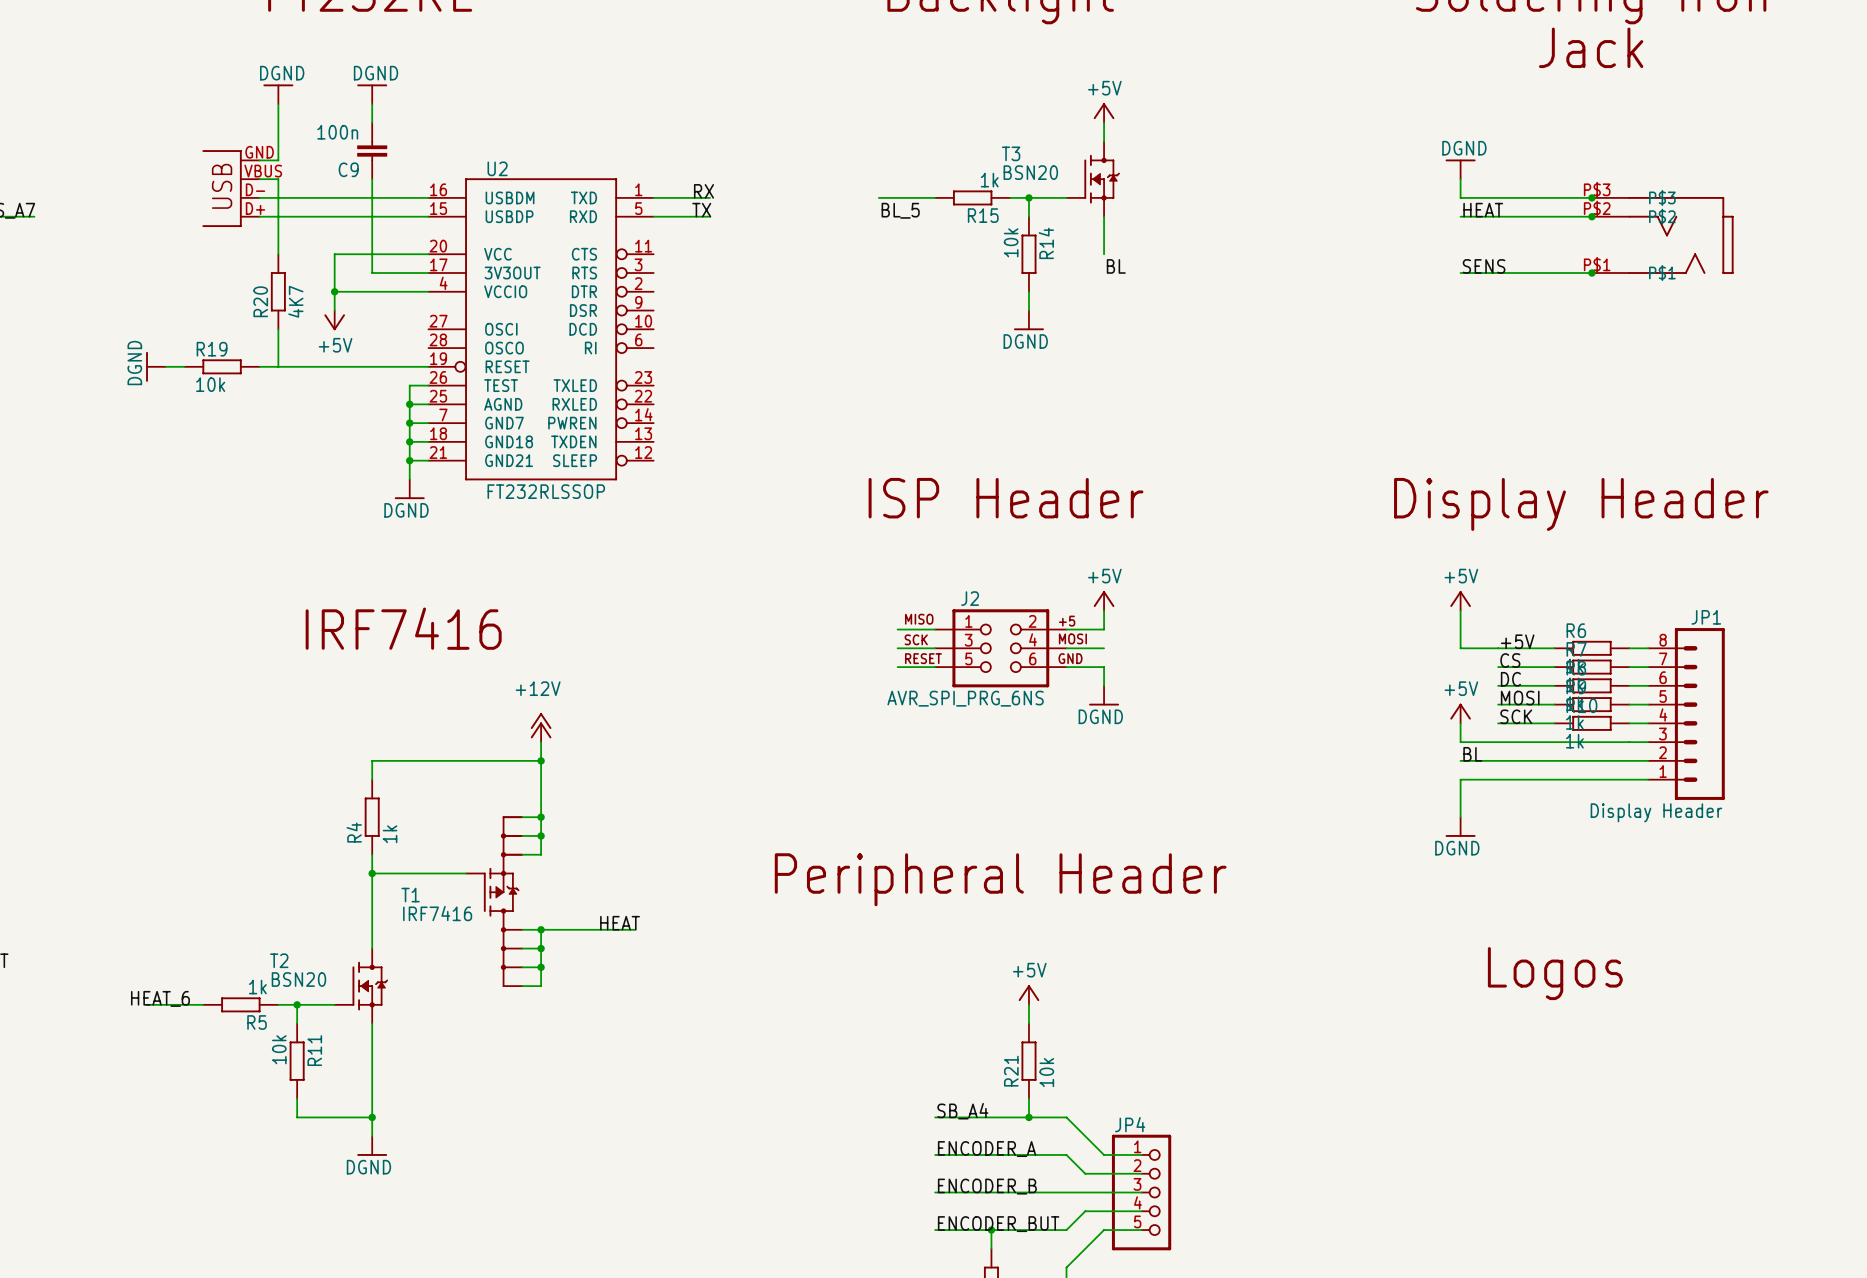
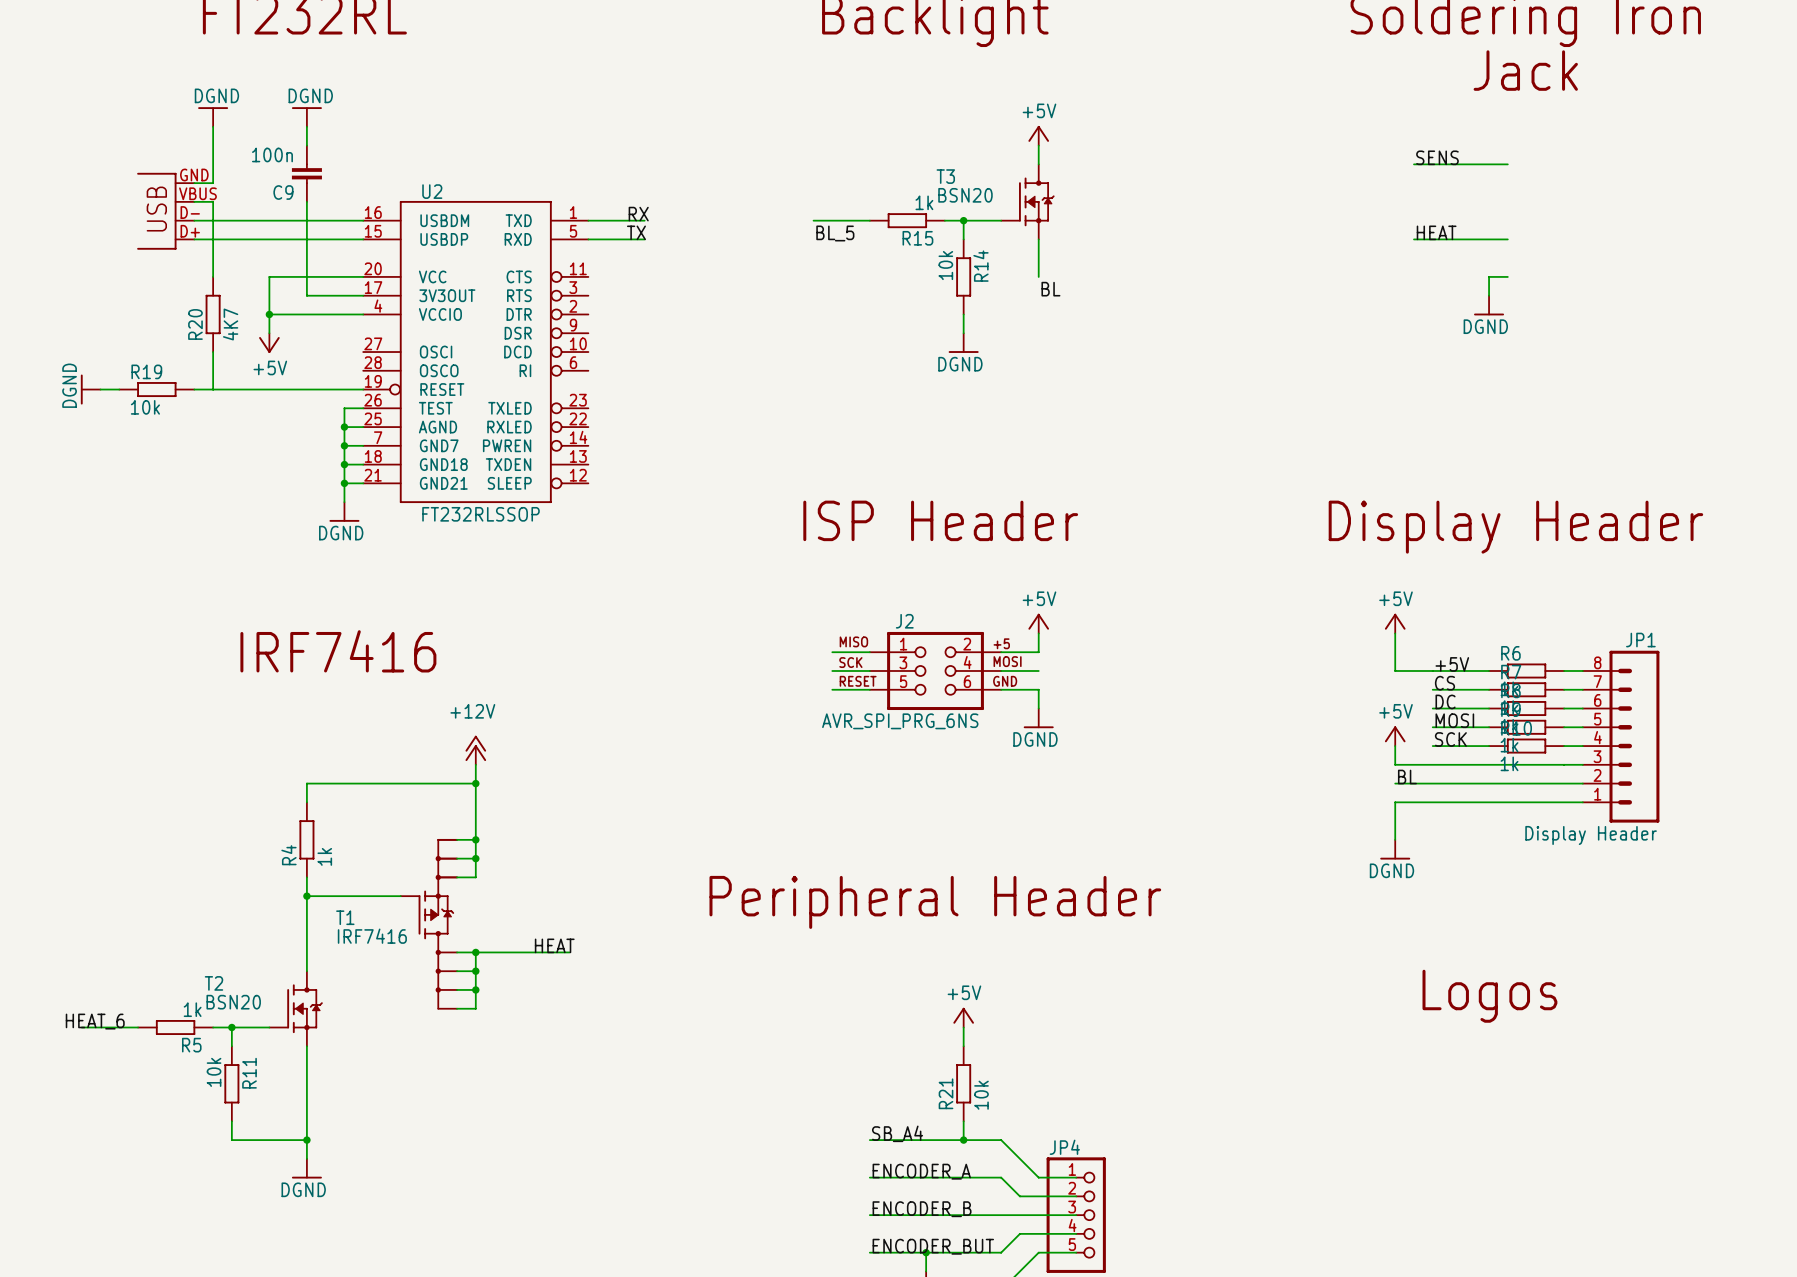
wire: none -> (1413, 164) (1507, 164)
power symbol rotation: 0° (1460, 160) -> 180° (1489, 314)
power symbol position: DGND (1460, 169) -> DGND (1489, 305)
wire: (1460, 179) (1460, 197) (1591, 197) -> none
junction: (1591, 197) -> none
label position: HEAT (1483, 210) -> HEAT (1436, 232)
wire: (1460, 216) (1479, 216) -> none
wire: (1573, 216) (1591, 216) -> none
junction: (1591, 216) -> none
part: (1662, 235) -> none
wire: none -> (1507, 276) (1489, 276) (1489, 295)
label position: SENS (1484, 266) -> SENS (1437, 157)
wire: (1460, 273) (1591, 273) -> none
junction: (1591, 273) -> none

